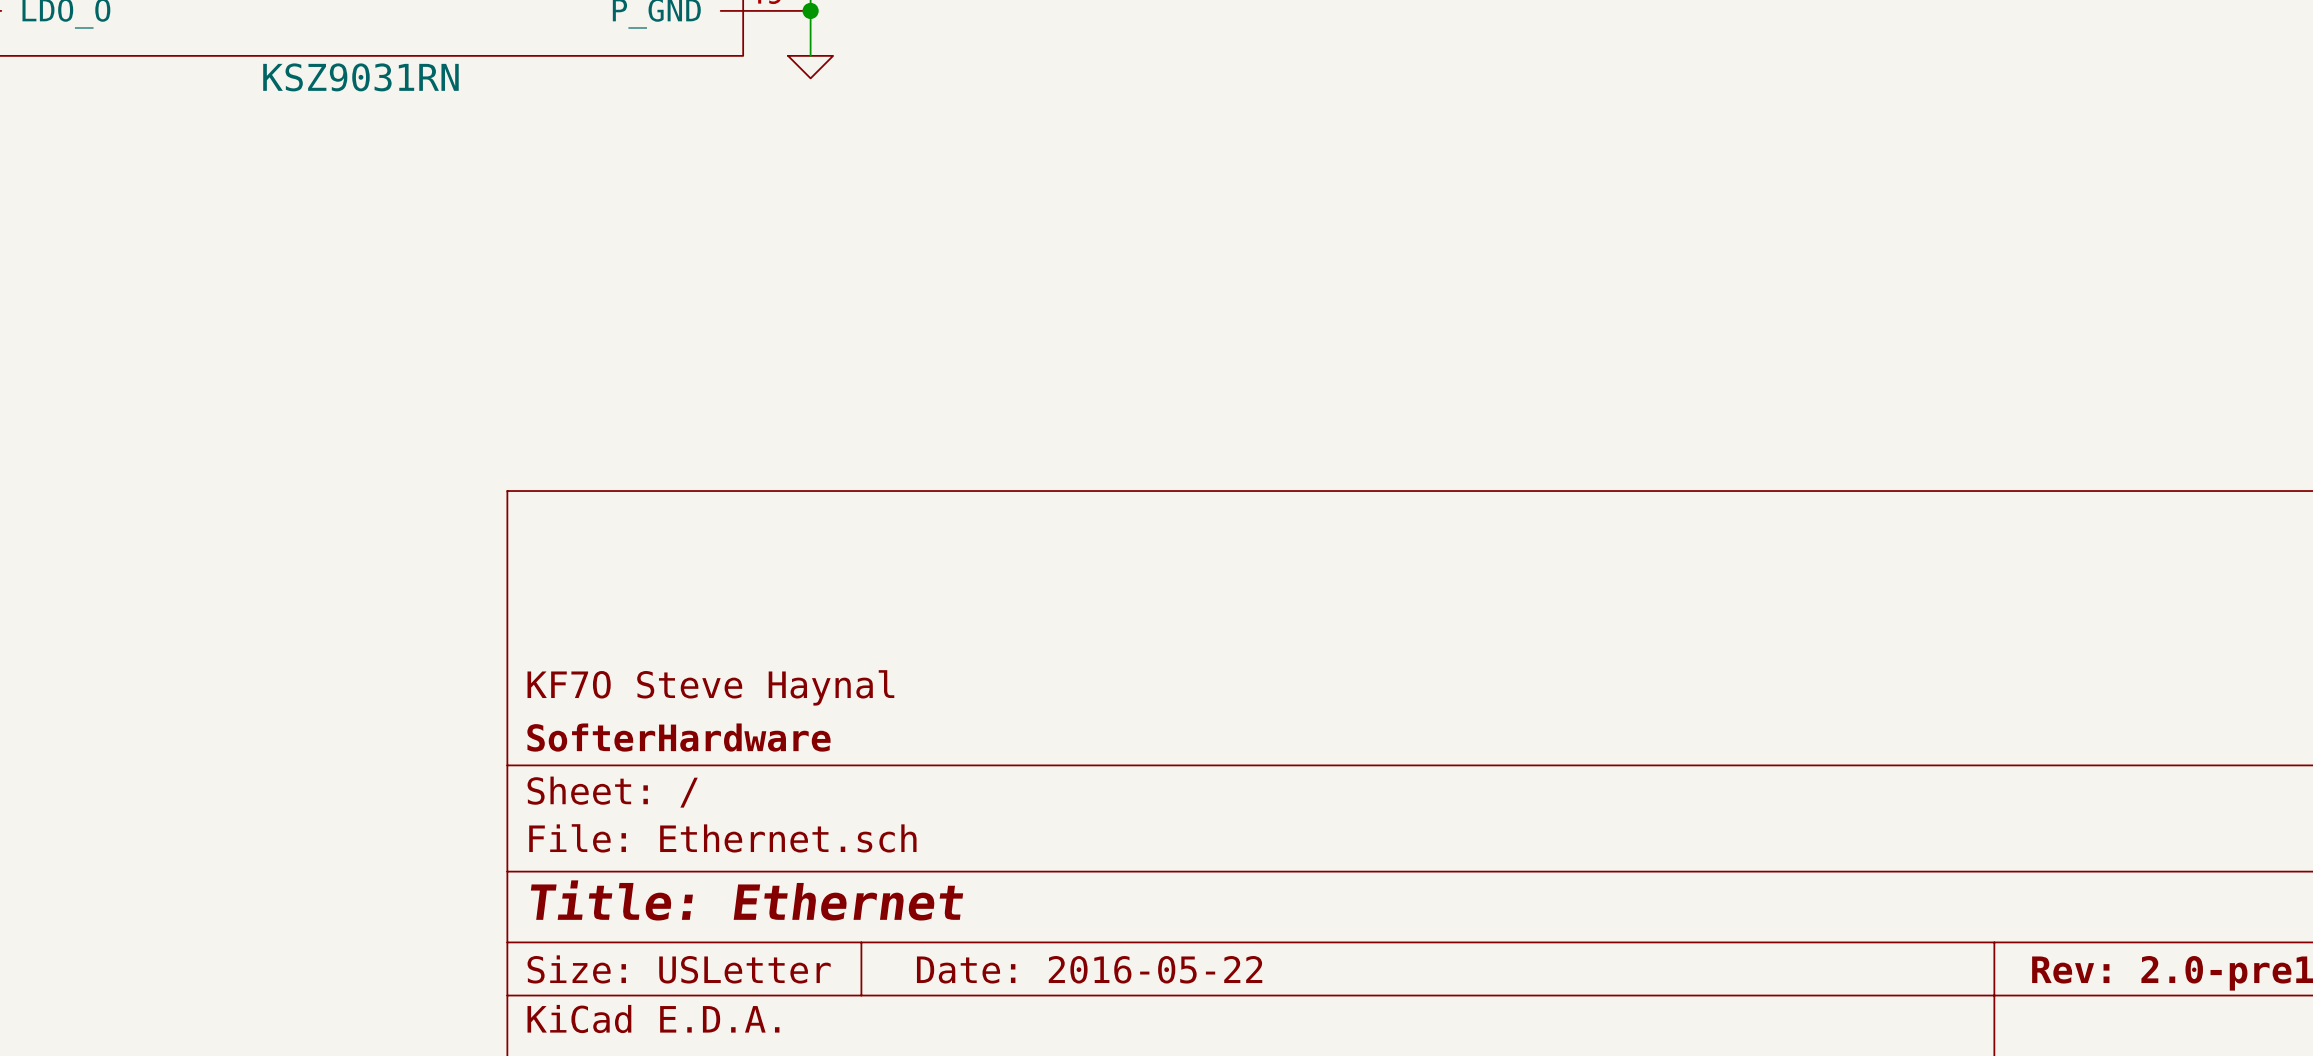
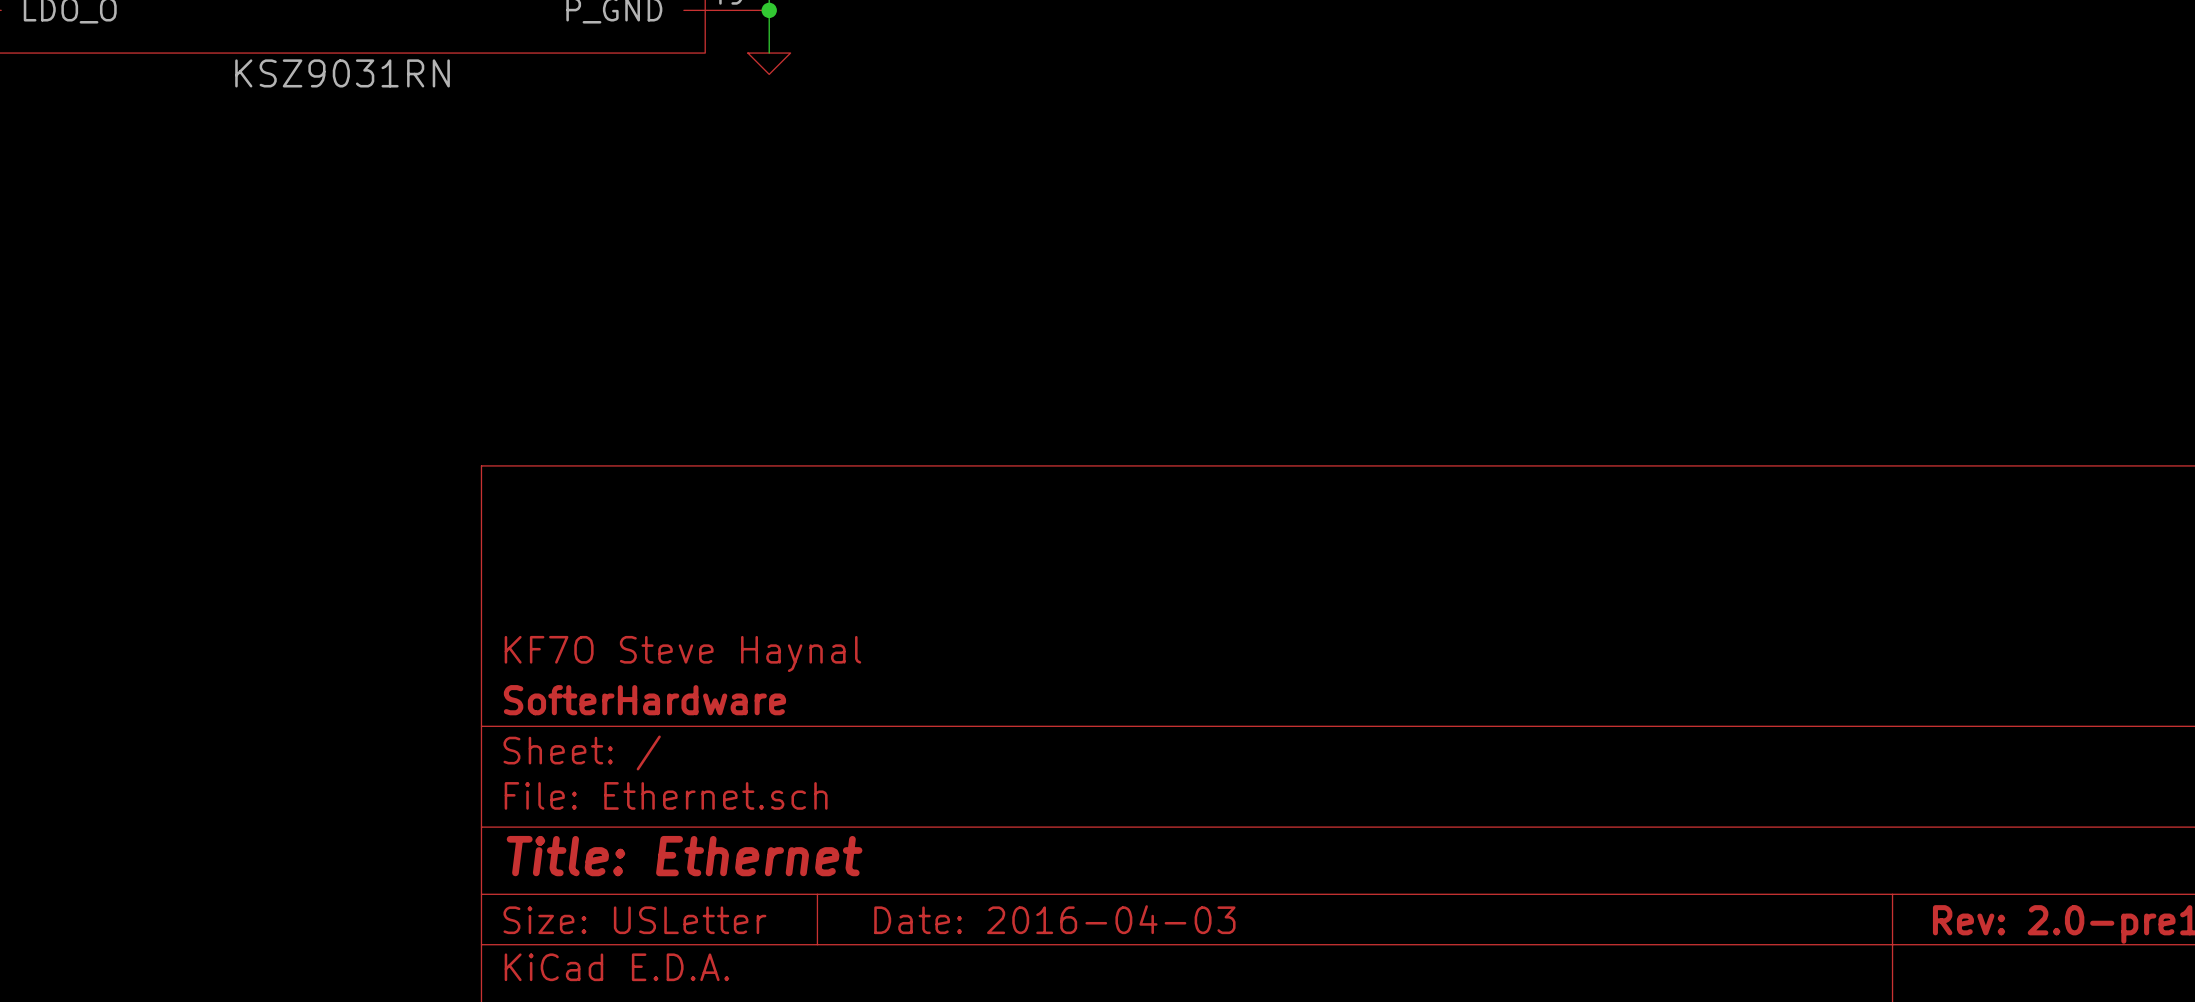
title block: Date: 2016-05-22 (1089, 969) -> Date: 2016-04-03 (1054, 919)

